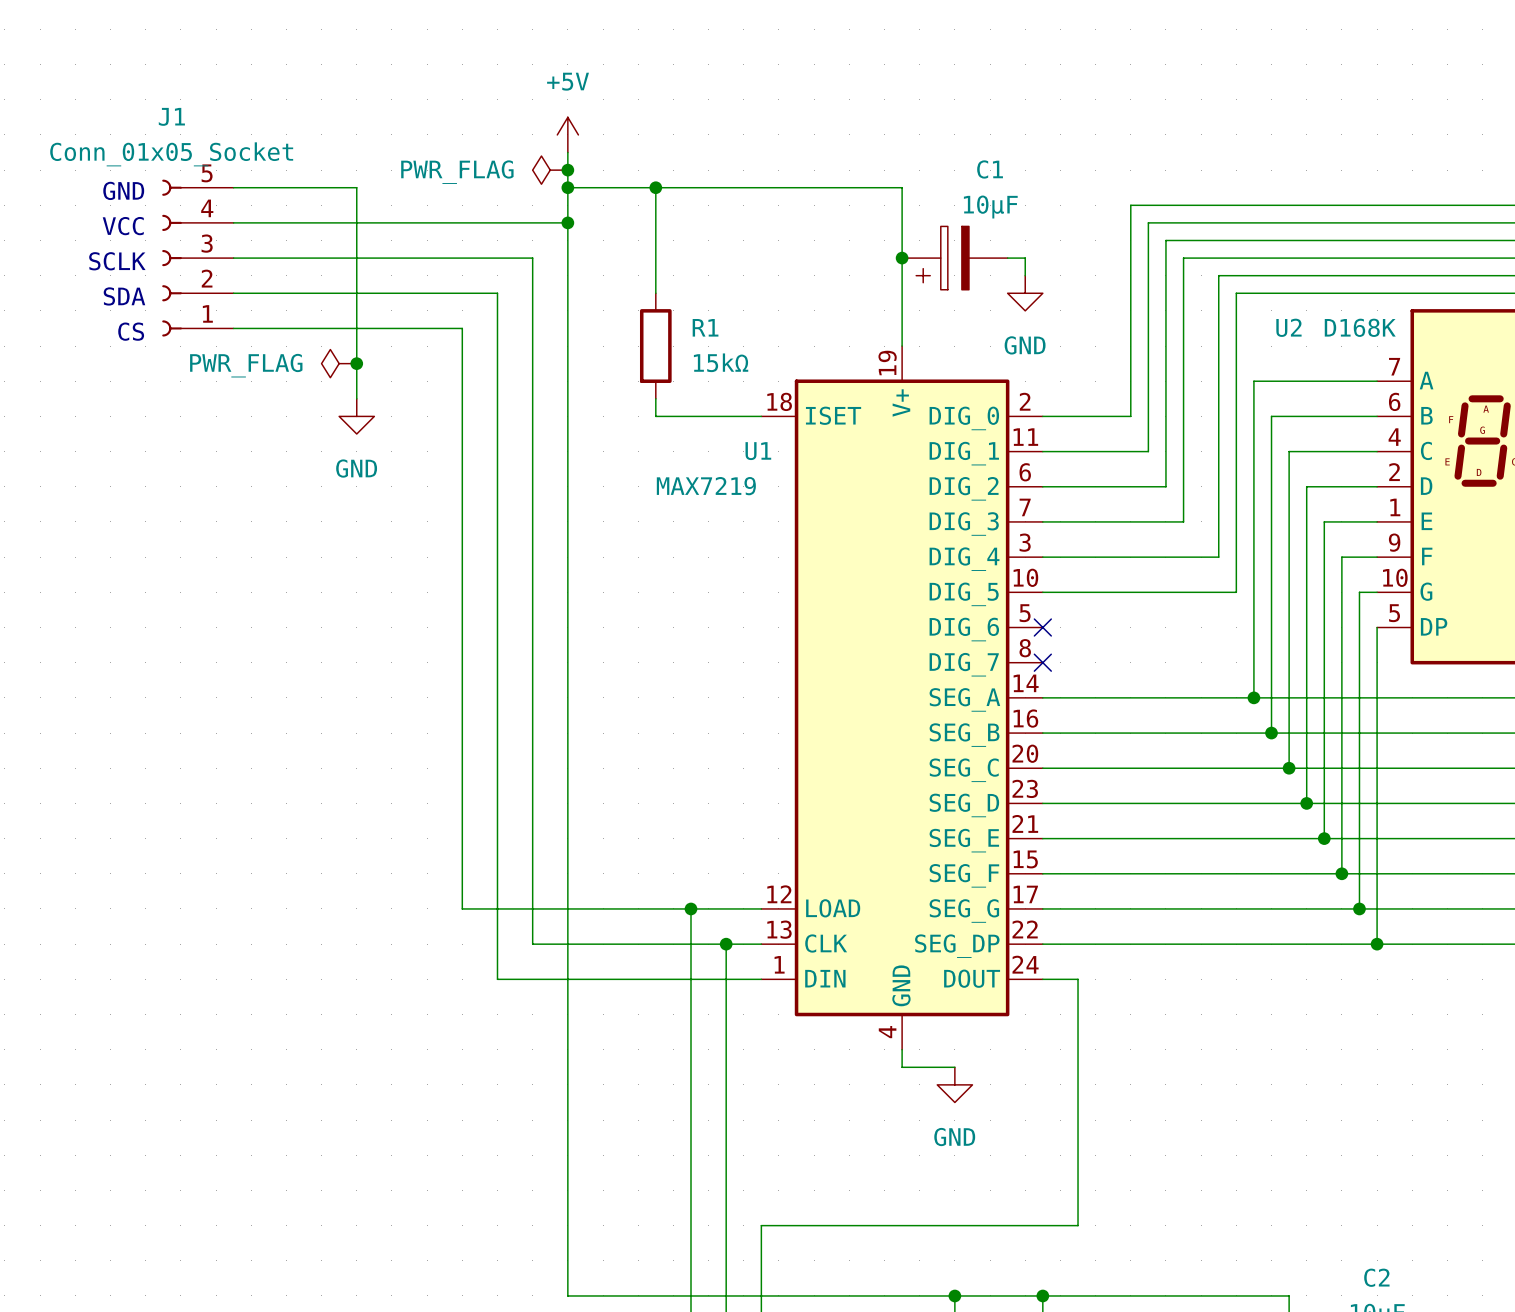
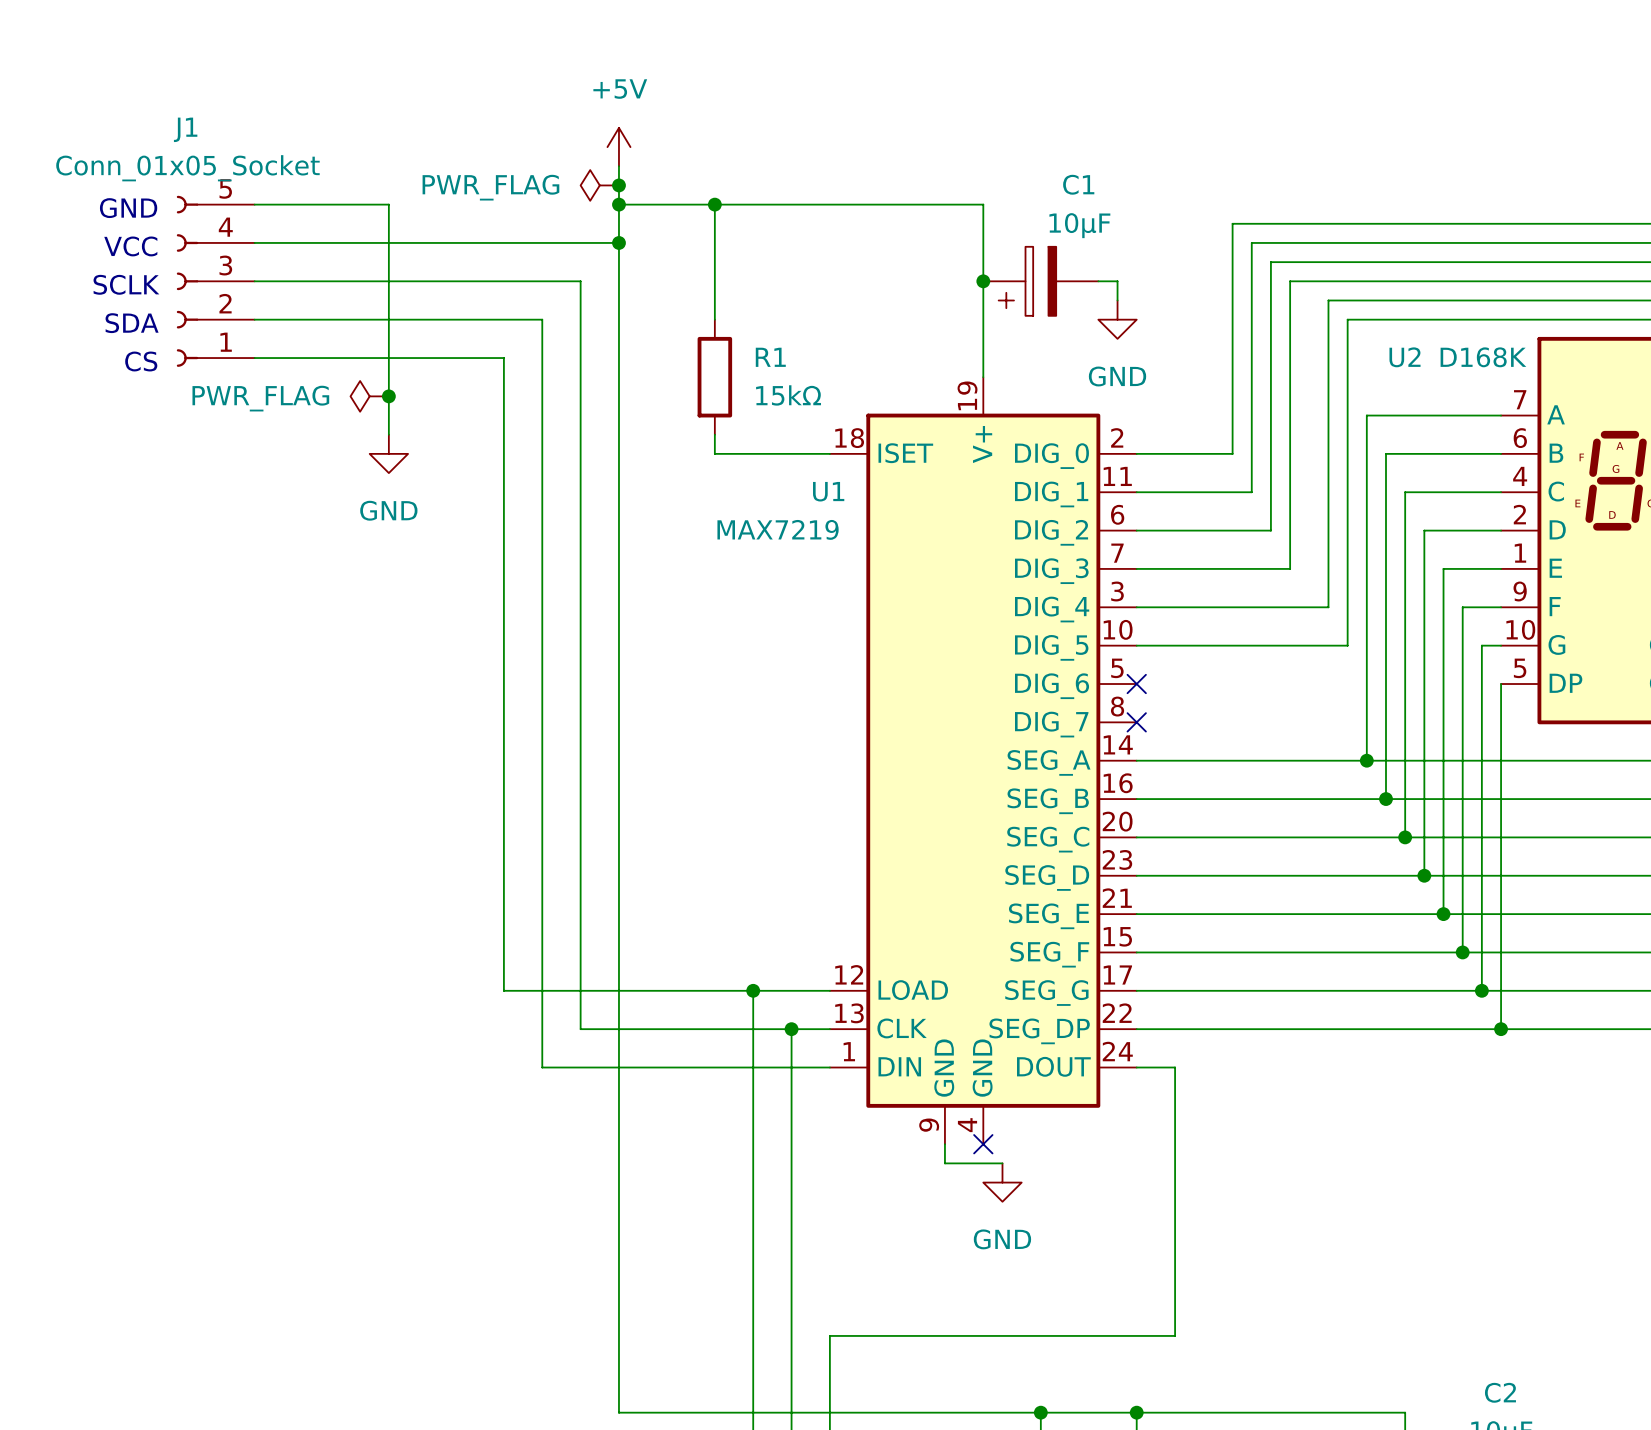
U1 symbol: [761, 346, 1043, 1050] -> [829, 377, 1137, 1145]
wire: (902, 1049) (902, 1067) -> (944, 1144) (944, 1163) (983, 1163)
no-connect mark: none -> (983, 1144)
wire: (919, 1067) (954, 1067) -> none
power symbol position: GND (954, 1084) -> GND (1002, 1182)

